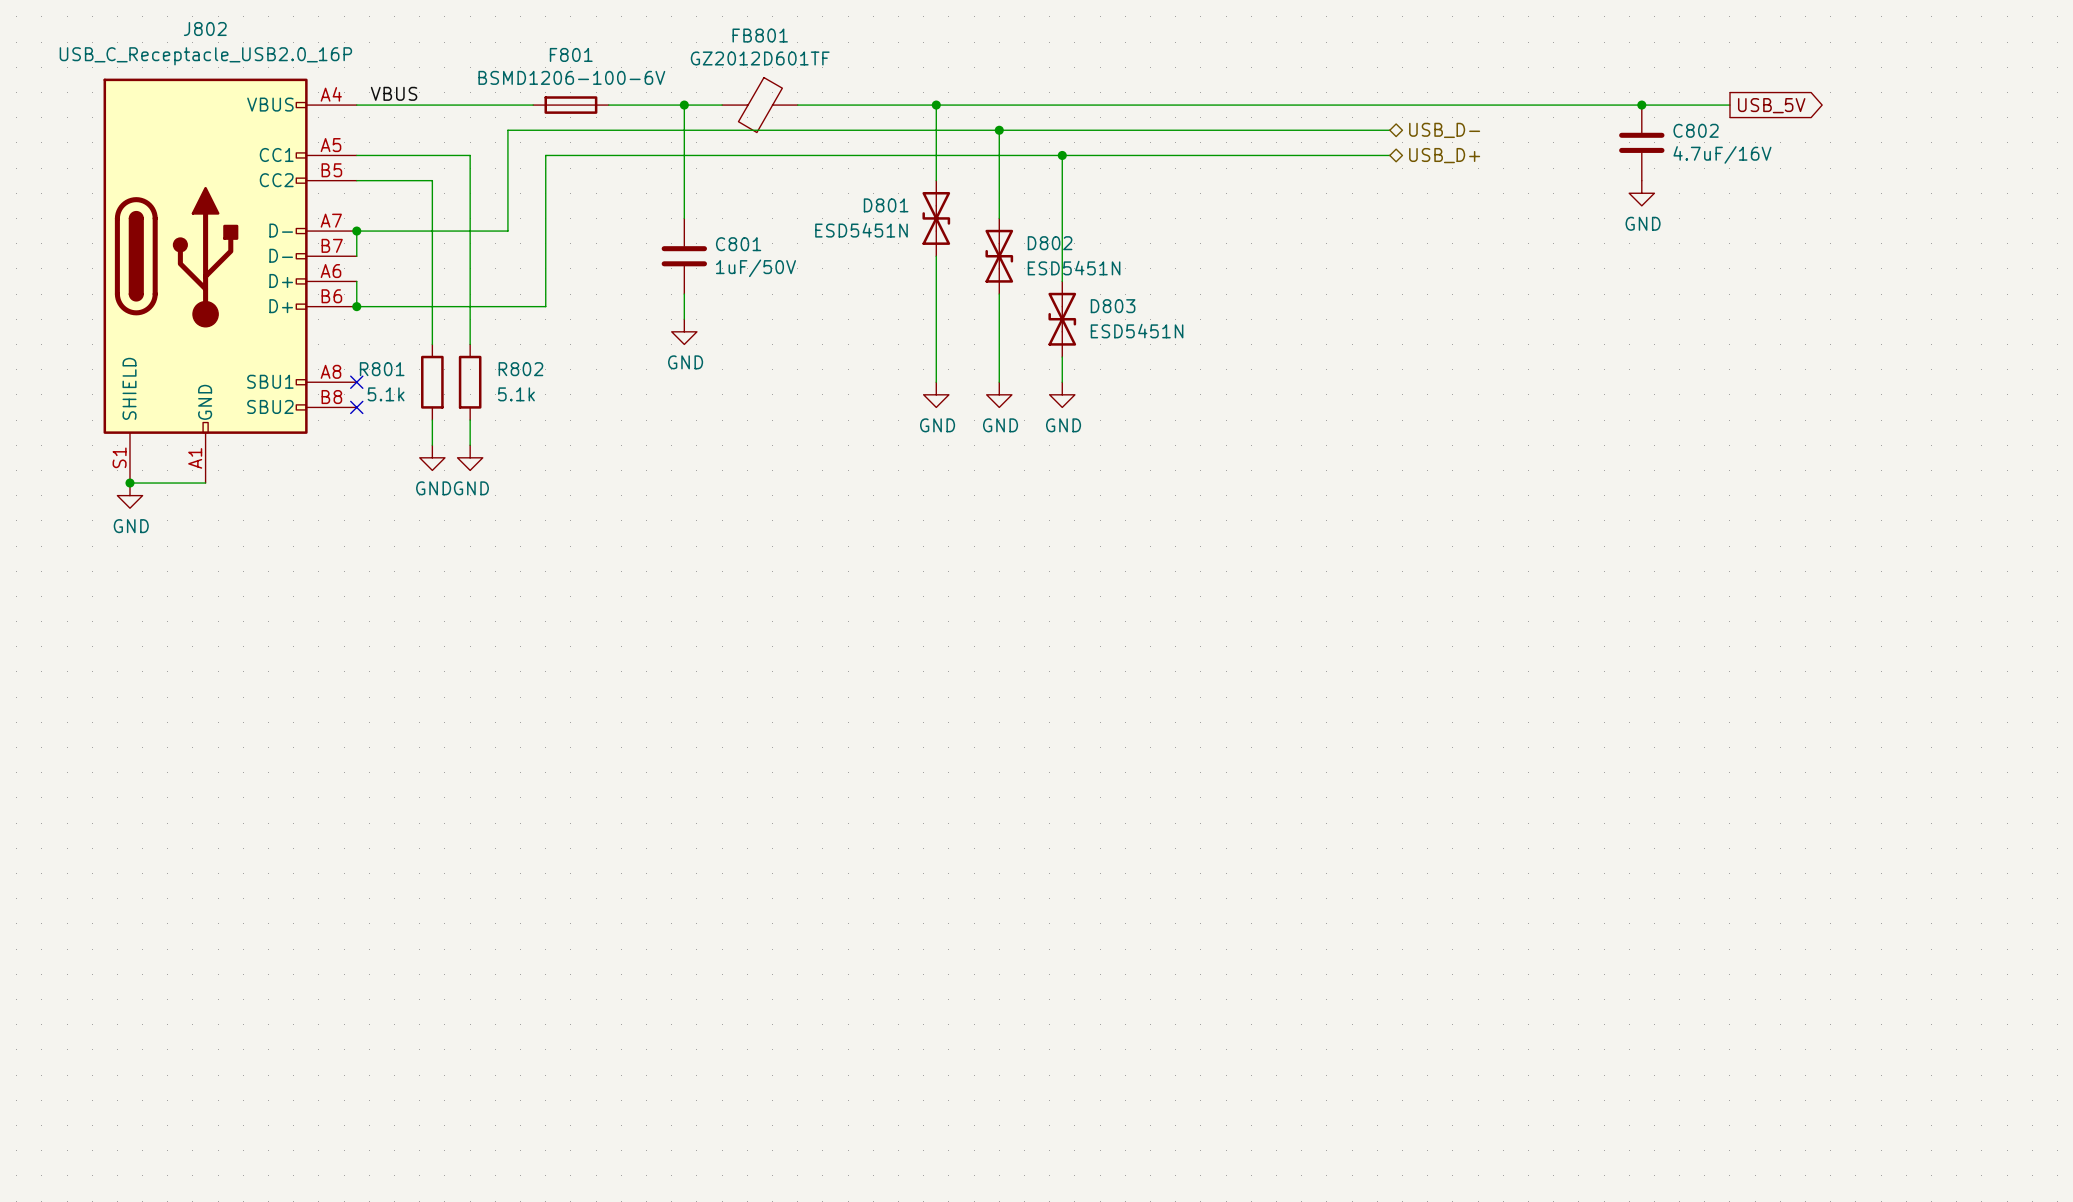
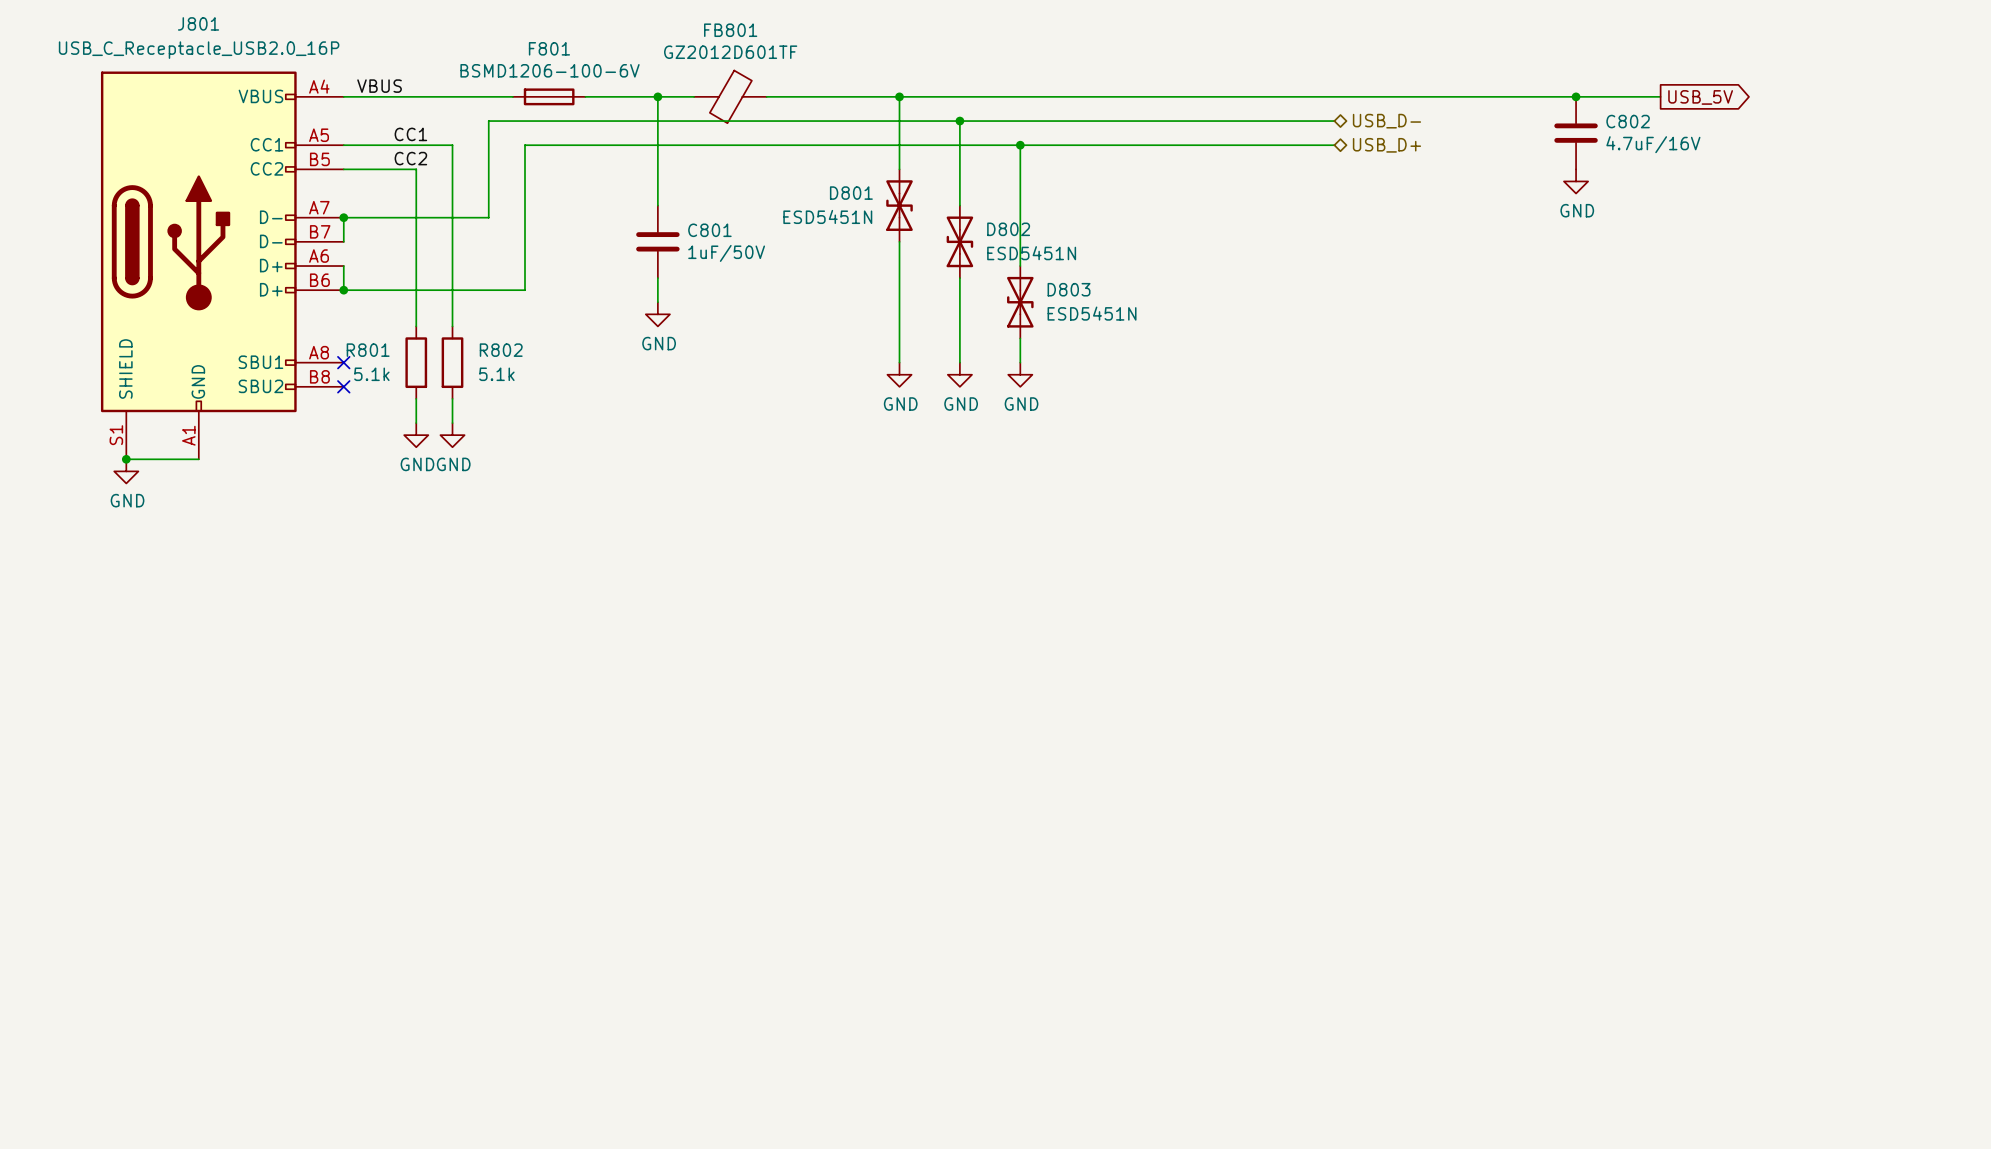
J802 name: J802 (205, 29) -> J801 (198, 23)
label: none -> CC1 (410, 134)
label: none -> CC2 (410, 158)

